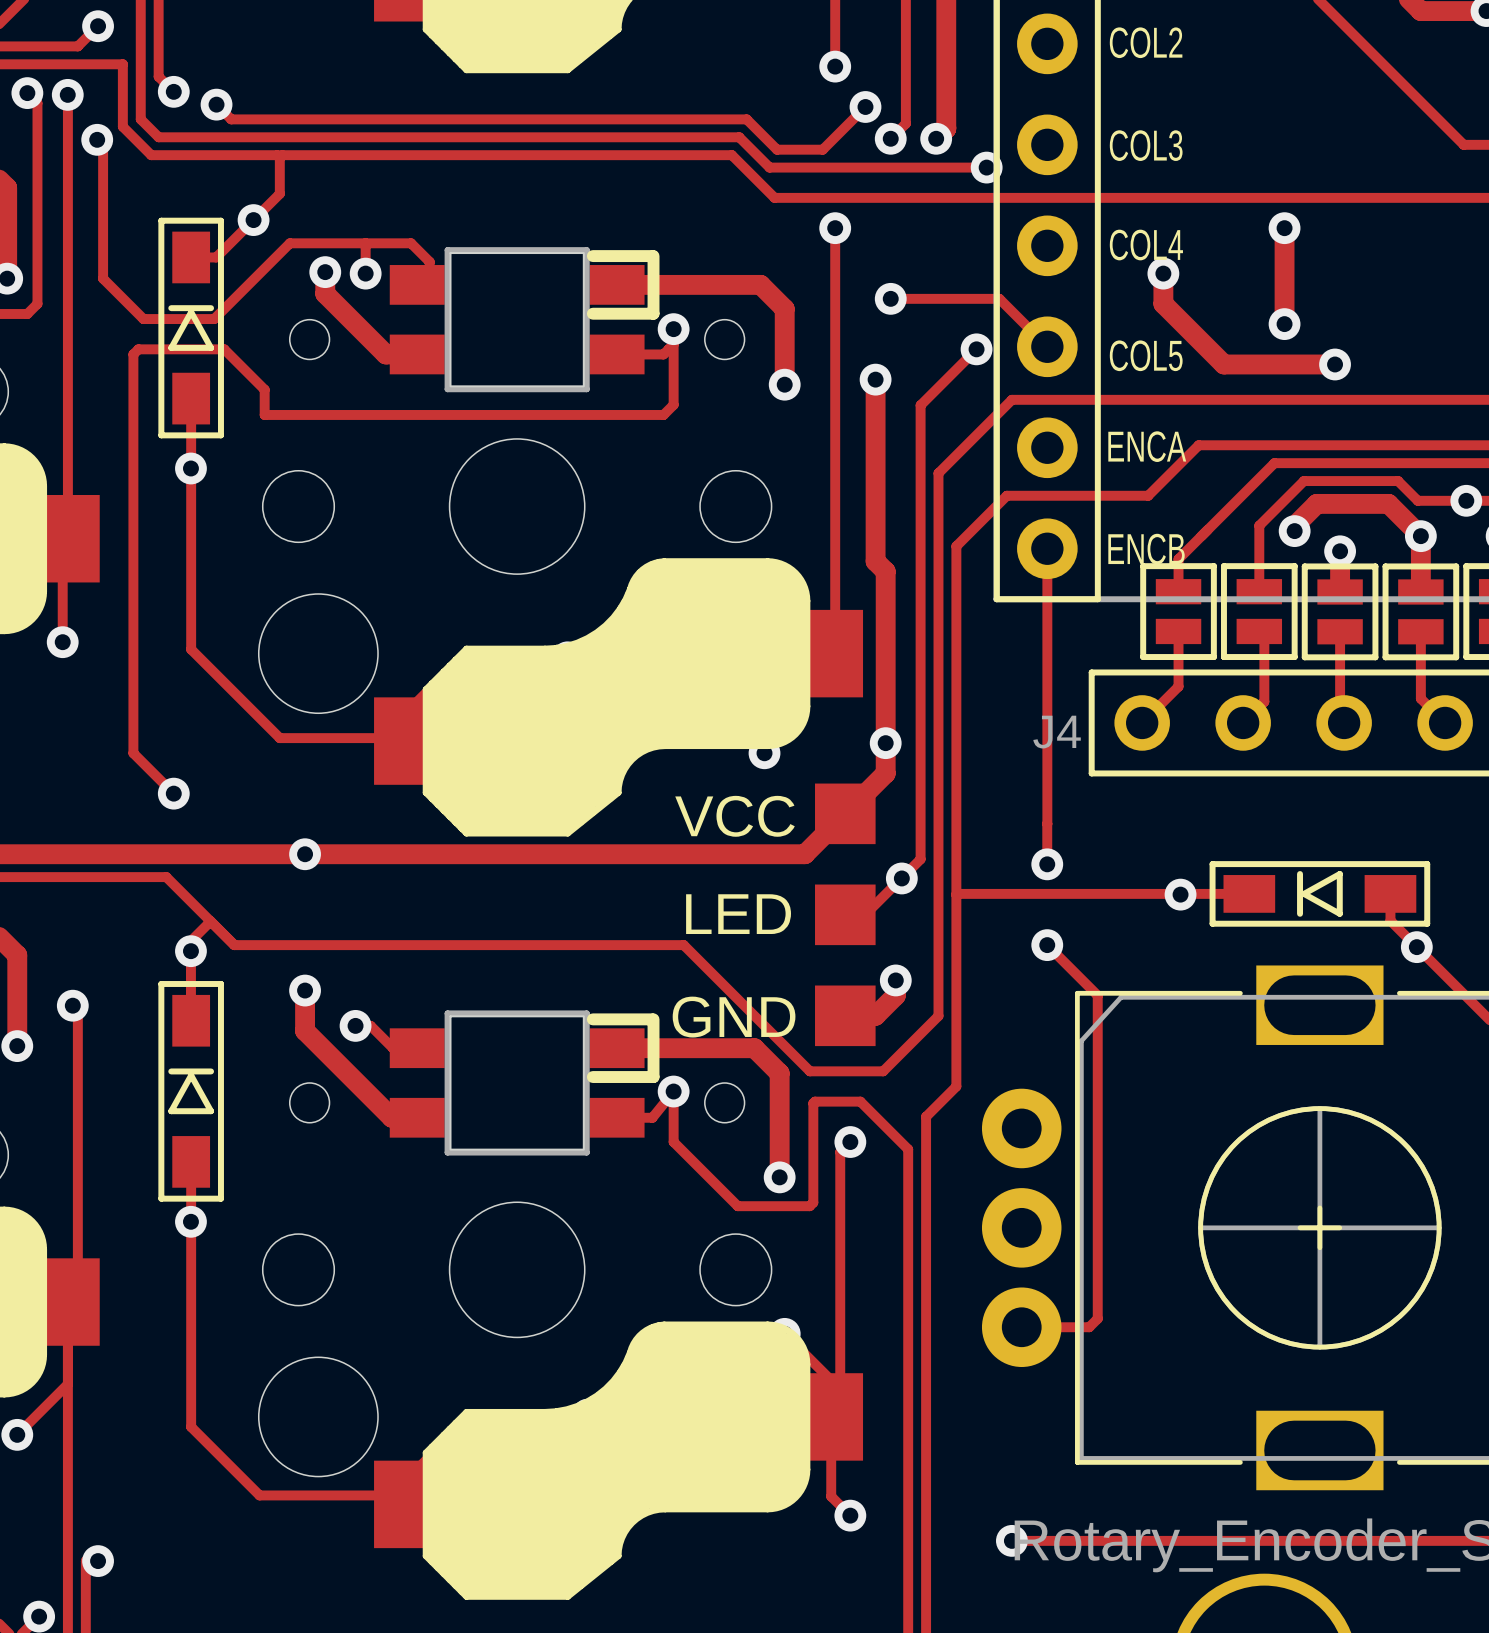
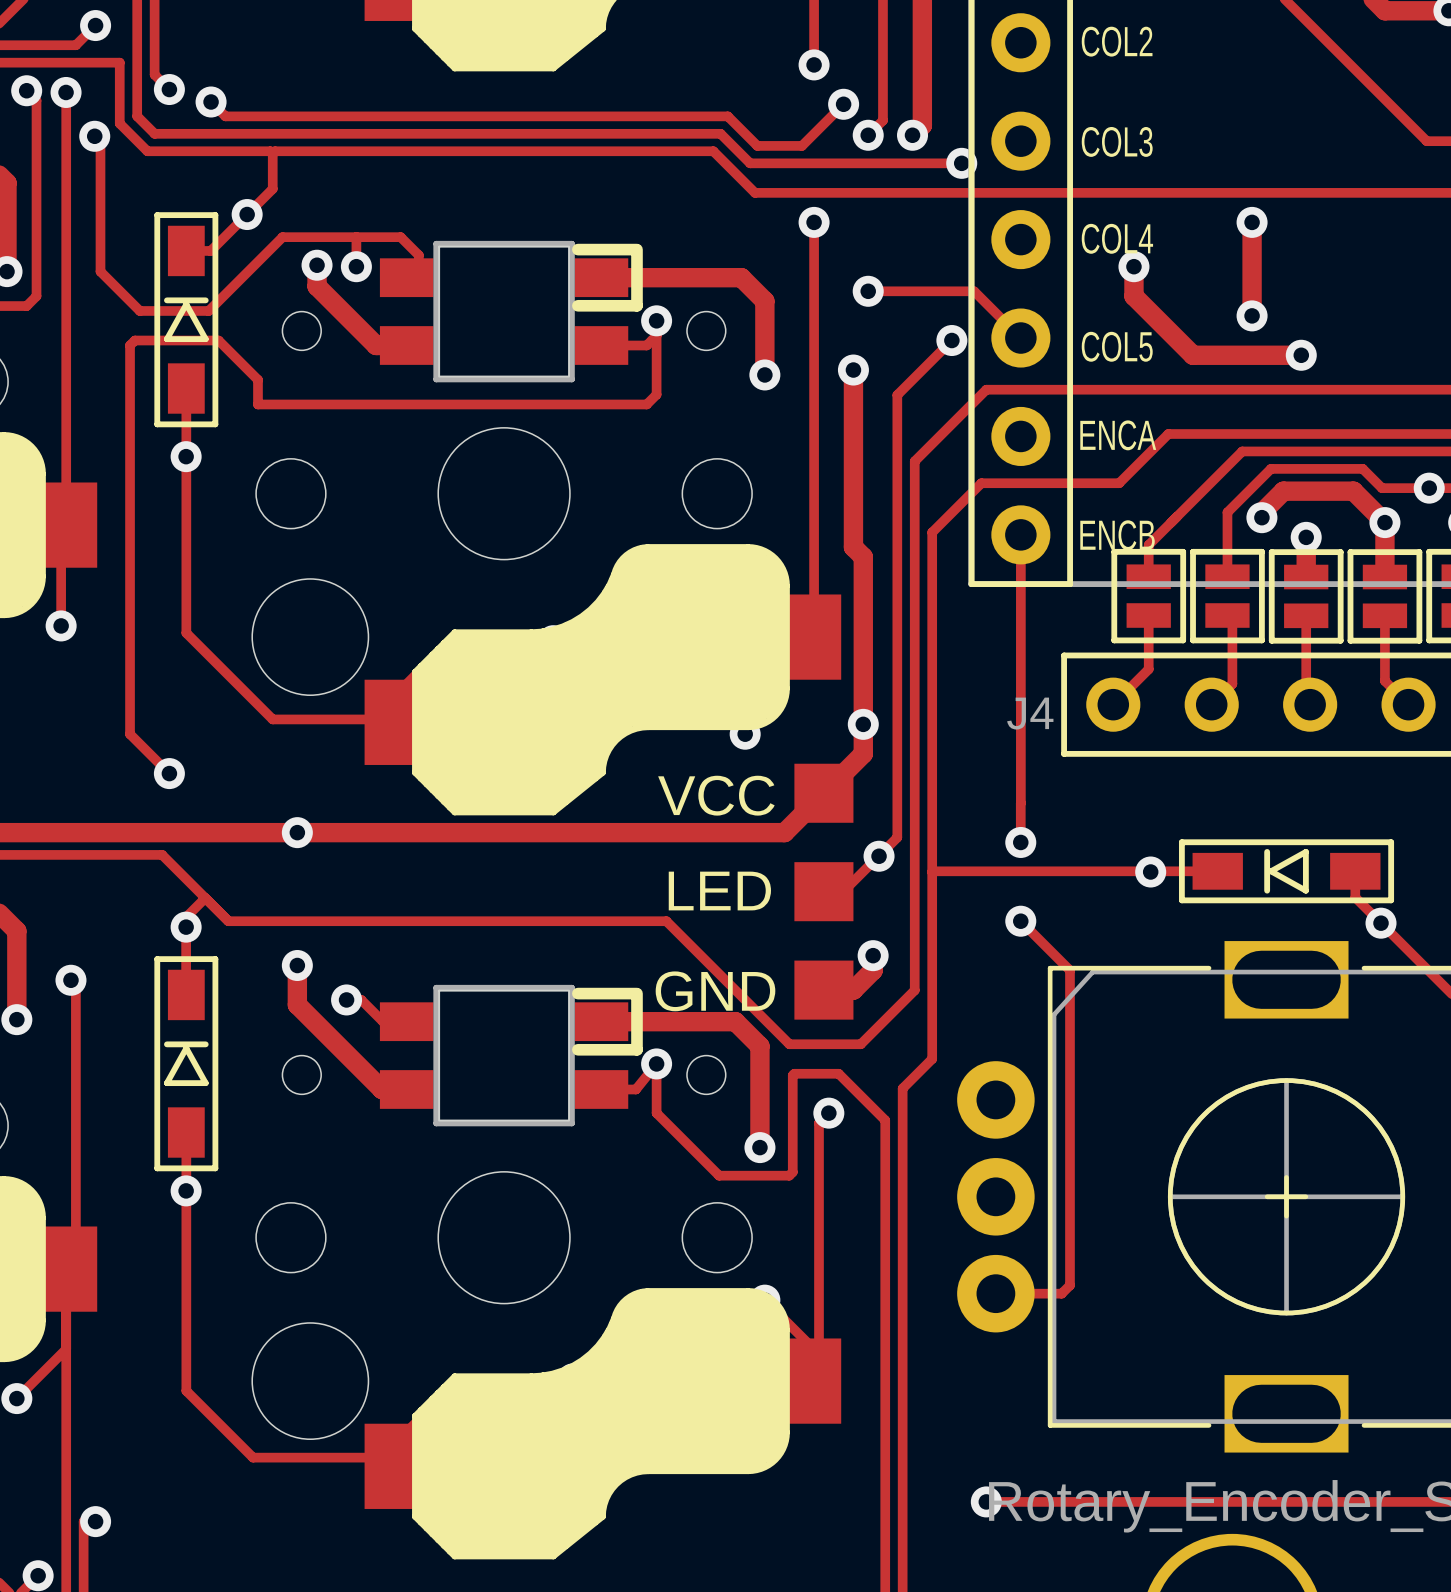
track: (831, 1416) (831, 1496) (850, 1515) -> none
via: (850, 1515) -> none

